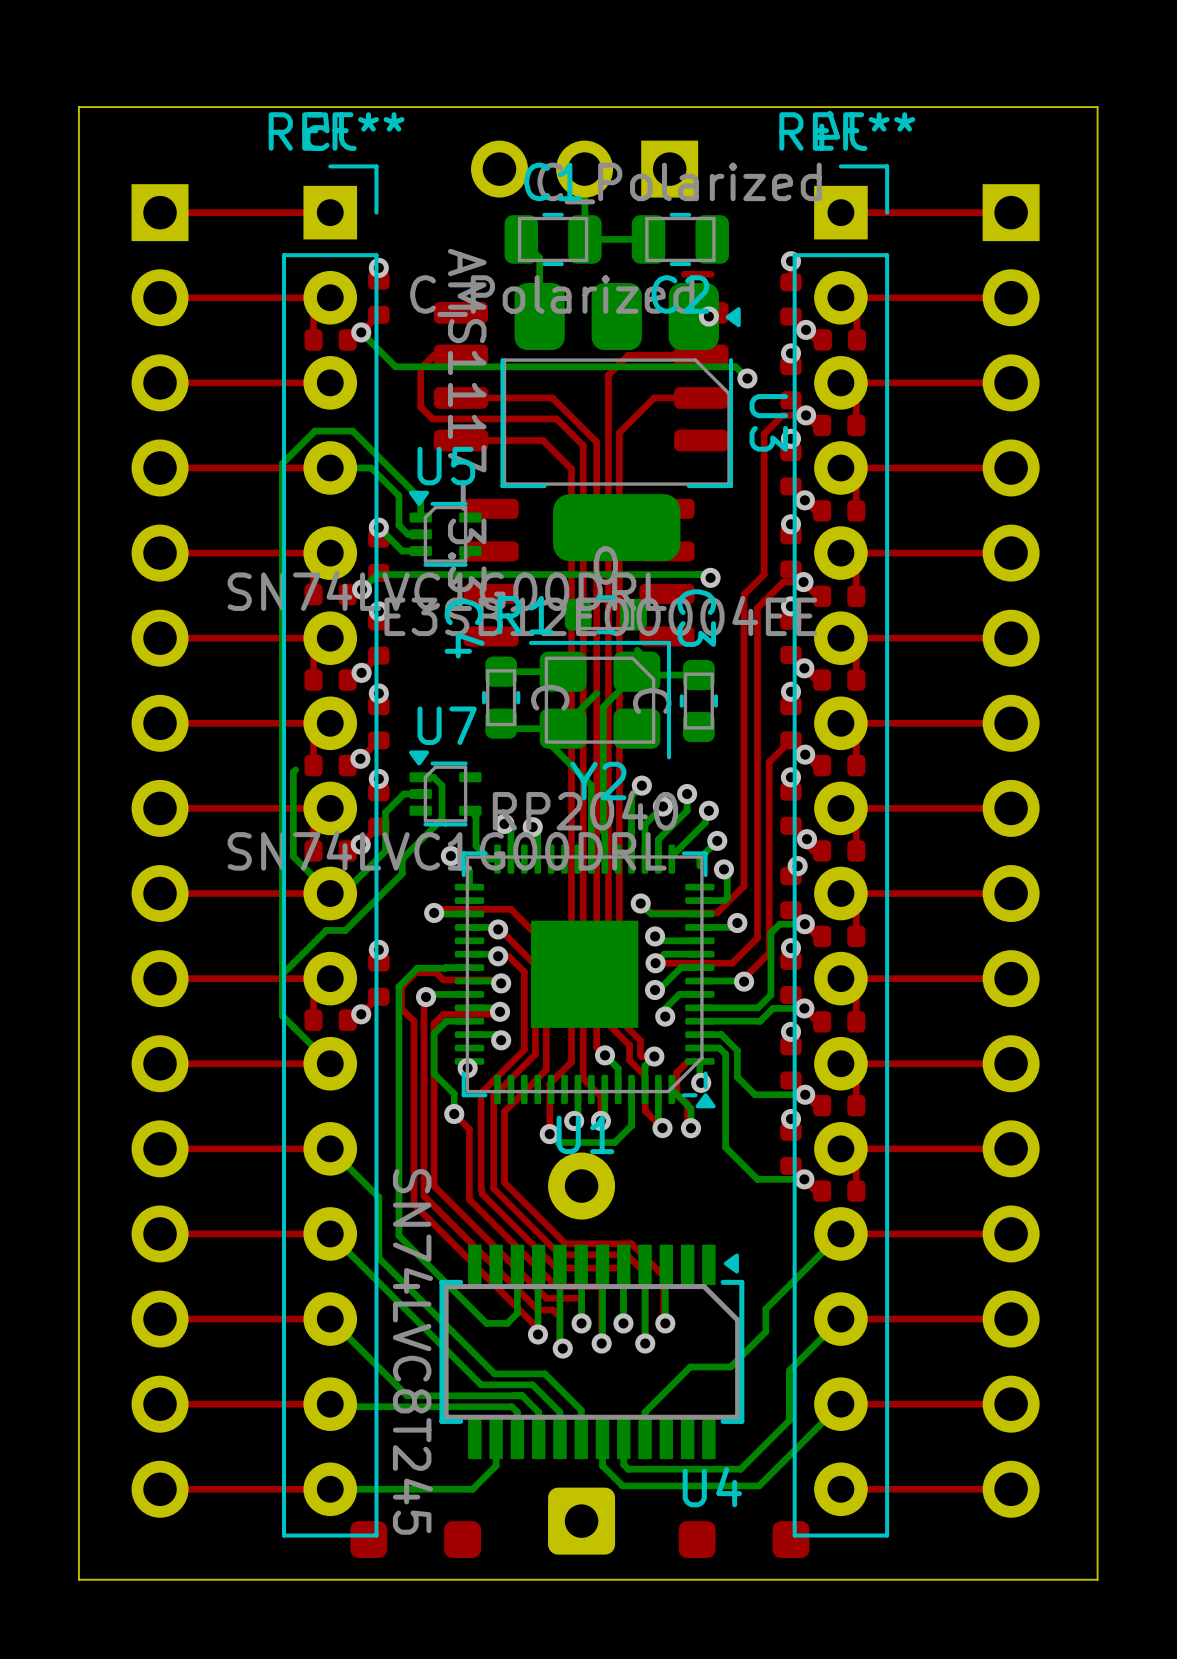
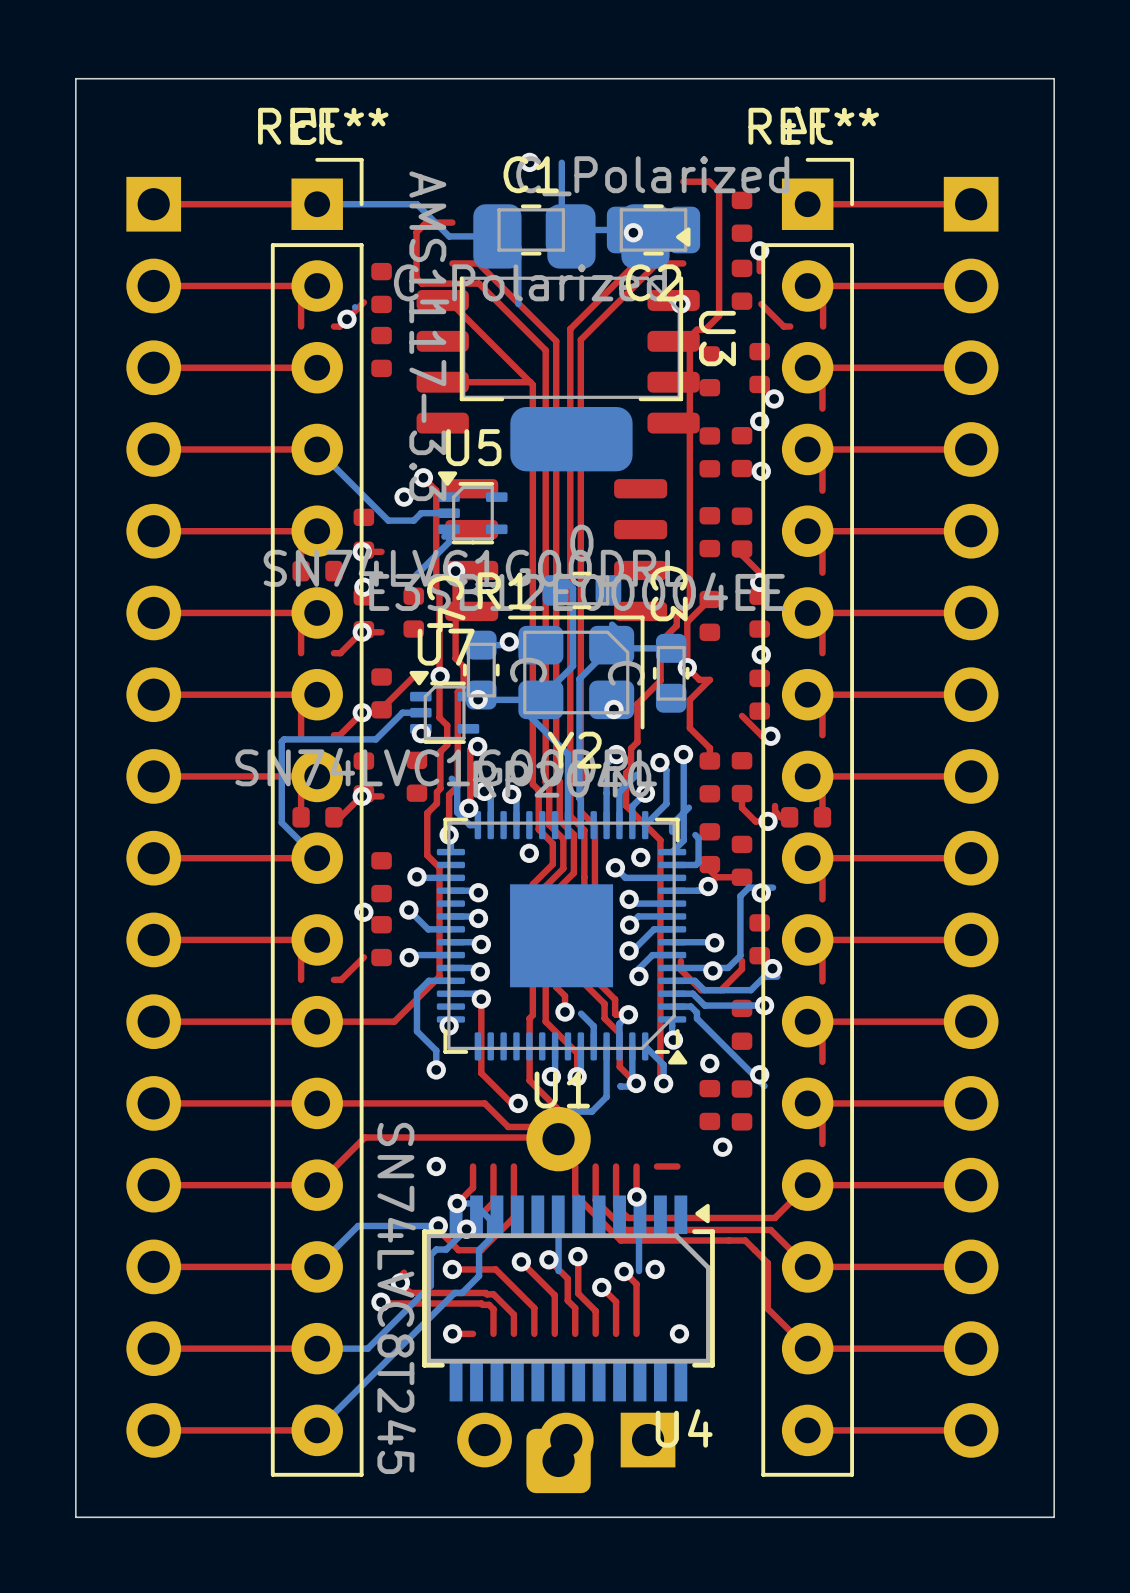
board edge: (1097, 107) (78, 107) -> (1054, 102) (1054, 78) (75, 78) (75, 102)
via: none -> (529, 162)
part: (584, 169) -> none
bottom track: none -> (317, 204) (416, 204) (449, 236) (497, 236)
part: none -> (742, 216)
via: none -> (633, 232)
via: (378, 267) -> none
top track: none -> (452, 263) (478, 263) (556, 341) (556, 777) (559, 781) (559, 820) (573, 834) (573, 873) (556, 890) (556, 987) (565, 995) (565, 1012)
part position: (378, 297) -> (381, 287)
part position: (790, 299) -> (742, 284)
via: (806, 329) -> none
bottom track: (361, 332) (395, 366) (735, 366) (747, 378) -> none
part rotation: 0° (330, 339) -> 90° clockwise (381, 351)
part position: (330, 339) -> (381, 351)
part: (839, 339) -> none
via: (790, 353) -> none
top track: (460, 355) (433, 355) (420, 368) (420, 407) (432, 418) (556, 418) (583, 445) (583, 1078) -> (452, 222) (426, 222) (416, 232) (416, 278) (421, 283) (479, 283) (545, 350) (545, 782) (549, 785) (549, 824) (563, 838) (563, 868) (545, 886) (545, 1021) (560, 1036)
top track: (701, 355) (628, 355) (608, 375) (608, 864) -> (676, 222) (570, 329) (570, 816) (584, 830)
via: (747, 378) -> none
part: none -> (709, 371)
top track: (701, 397) (654, 397) (619, 432) (619, 859) -> (657, 263) (580, 339) (580, 811) (594, 825)
top track: (554, 400) (596, 442) (596, 1046) (605, 1055) -> (532, 384) (532, 784) (538, 790) (538, 829) (552, 843) (552, 864) (532, 884) (532, 1015) (529, 1018) (529, 1080) (560, 1111)
top track: (806, 415) (782, 415) (764, 433) (764, 574) (744, 594) (744, 886) (717, 912) (650, 912) (640, 903) -> none
U3 position: (620, 422) -> (575, 337)
part: (839, 425) -> none
top track: (460, 440) (543, 440) (571, 468) (571, 1062) (549, 1083) (549, 1134) -> none
bottom track: (330, 467) (371, 467) (398, 495) (398, 525) (407, 534) (420, 534) -> (317, 449) (388, 520) (413, 520) (421, 513) (449, 513)
part position: (790, 469) -> (742, 452)
part: none -> (709, 452)
top track: none -> (423, 477) (436, 490) (436, 590) (439, 593) (439, 676)
via: none -> (423, 477)
via position: (804, 500) -> (761, 471)
part: (839, 510) -> none
bottom track: (420, 517) (420, 499) (352, 431) (314, 431) (282, 463) (282, 1015) (330, 1063) -> none
via: none -> (404, 497)
via: (790, 524) -> none
bottom track: (378, 527) (402, 551) (420, 551) -> none
via: (378, 527) -> none
U5 position: (445, 528) -> (472, 507)
bottom track: none -> (449, 529) (449, 542) (413, 577)
part position: (790, 552) -> (742, 532)
part: none -> (709, 532)
top track: none -> (381, 551) (362, 551)
top track: none -> (742, 551) (742, 555) (761, 574)
bottom track: (710, 577) (707, 574) (377, 574) (362, 589) -> none
via: (710, 577) -> none
top track: (803, 582) (783, 582) (757, 608) (757, 938) (732, 963) (655, 963) -> none
via: (803, 582) -> none
via position: (362, 589) -> (362, 551)
top track: none -> (455, 571) (455, 658) (463, 666) (463, 686) (457, 691) (457, 786) (449, 794) (449, 835)
via: none -> (455, 571)
part: (839, 596) -> none
bottom track: none -> (558, 574) (573, 588) (573, 666)
top track: none -> (709, 599) (687, 621) (687, 667) (699, 679) (709, 679) (689, 699) (689, 728) (709, 748) (709, 761)
part: none -> (413, 612)
part: none -> (709, 615)
top track: none -> (381, 632) (362, 632)
via: none -> (509, 641)
via: (804, 668) -> none
via position: (361, 672) -> (362, 632)
part: (330, 680) -> none
part: (839, 680) -> none
via: none -> (761, 654)
via: (790, 691) -> none
via: (378, 693) -> none
via: none -> (687, 667)
top track: none -> (413, 676) (381, 709)
top track: none -> (440, 676) (439, 717) (447, 725) (447, 744) (440, 751) (440, 788) (436, 792) (436, 803) (427, 813) (427, 855) (439, 867) (439, 976) (394, 1021) (317, 1021)
via: none -> (440, 676)
part position: (378, 723) -> (381, 693)
via: none -> (478, 699)
via: none -> (613, 709)
bottom track: none -> (420, 712) (402, 712) (375, 739) (284, 739)
top track: none -> (742, 715) (762, 736) (770, 736)
via: (805, 754) -> none
via position: (360, 758) -> (362, 712)
via: none -> (421, 733)
part: (330, 765) -> none
top track: (822, 765) (816, 765) (790, 740) (769, 762) (769, 953) (744, 978) (744, 981) -> none
part: (839, 765) -> none
via: none -> (770, 736)
bottom track: (420, 777) (433, 777) (442, 785) (442, 819) (402, 858) (402, 873) (345, 930) (326, 930) (282, 974) -> none
top track: none -> (477, 746) (473, 746) (470, 749) (468, 808)
via: none -> (477, 746)
via: (790, 777) -> none
via: (378, 778) -> none
bottom track: none -> (683, 754) (683, 840) (672, 852)
via: none -> (683, 754)
U7 position: (445, 788) -> (444, 707)
bottom track: (420, 794) (403, 794) (385, 812) (385, 850) (342, 893) (330, 893) -> none
bottom track: (687, 794) (687, 810) (672, 825) -> none
via position: (662, 806) -> (645, 793)
part: none -> (416, 776)
part position: (790, 808) -> (742, 777)
part: none -> (709, 777)
bottom track: (708, 810) (705, 814) (705, 822) (671, 856) (671, 859) -> (654, 758) (666, 770) (666, 803) (645, 825)
via: (708, 810) -> none
top track: none -> (381, 796) (362, 796)
top track: none -> (742, 796) (742, 807) (755, 821) (767, 821)
via: (806, 839) -> none
via: (717, 840) -> none
via: none -> (468, 808)
via position: (360, 844) -> (362, 796)
via position: (450, 855) -> (449, 835)
via: none -> (767, 821)
via: (797, 866) -> none
via: (723, 869) -> none
part: none -> (709, 848)
via: none -> (529, 853)
via: none -> (640, 857)
part position: (790, 893) -> (742, 860)
top track: none -> (709, 870) (716, 877) (742, 877)
top track: (434, 912) (437, 909) (510, 909) (545, 943) (546, 1069) (504, 1111) (504, 1182) (565, 1243) (631, 1243) (663, 1276) (663, 1311) (665, 1313) -> none
part: none -> (381, 877)
via: (804, 924) -> none
top track: (498, 929) (535, 964) (535, 1054) (493, 1096) (493, 1188) (559, 1254) (626, 1254) (645, 1273) (645, 1333) -> none
via: none -> (761, 892)
part: (839, 936) -> none
via: none -> (408, 910)
via: (790, 948) -> none
top track: (498, 956) (508, 956) (524, 971) (524, 1049) (481, 1093) (481, 1193) (556, 1268) (623, 1268) (623, 1313) -> none
bottom track: (445, 967) (417, 968) (398, 986) (398, 1235) (486, 1323) (507, 1323) (517, 1313) (517, 1264) -> (428, 929) (408, 910)
part position: (378, 979) -> (381, 941)
top track: (501, 983) (497, 979) (443, 979) (436, 972) (415, 972) (401, 986) (401, 1008) (414, 1021) (414, 1204) (538, 1328) (538, 1334) -> none
top track: (426, 997) (424, 999) (424, 1196) (538, 1310) (553, 1310) (559, 1316) (559, 1343) -> none
top track: none -> (742, 960) (742, 969) (720, 990) (701, 990) (680, 969) (680, 961)
bottom track: (804, 1008) (772, 1008) (760, 1021) (723, 1021) -> (777, 976) (764, 976) (750, 990) (704, 990) (694, 980)
via: none -> (712, 970)
top track: (500, 1011) (497, 1014) (443, 1014) (434, 1023) (434, 1186) (546, 1298) (581, 1298) (581, 1313) -> none
via: (361, 1014) -> none
part: (330, 1020) -> none
part: (839, 1021) -> none
via position: (790, 1031) -> (764, 1005)
top track: none -> (481, 999) (481, 1073) (511, 1103) (518, 1103)
bottom track: (733, 1046) (737, 1050) (737, 1077) (754, 1094) (805, 1094) -> (704, 1005) (764, 1005)
via position: (605, 1055) -> (565, 1012)
bottom track: (725, 1060) (725, 1147) (757, 1179) (804, 1179) -> (696, 1018) (764, 1086)
top track: (687, 1061) (676, 1072) (676, 1093) (687, 1103) -> (683, 181) (709, 181) (719, 191) (719, 315) (705, 329) (696, 329) (689, 336) (689, 604) (676, 617) (676, 625) (660, 641) (660, 680) (637, 703) (637, 742) (631, 748) (631, 767) (626, 772) (626, 805) (660, 840) (660, 1060)
part position: (790, 1063) -> (742, 1024)
via: (805, 1094) -> none
part: (839, 1105) -> none
via: none -> (709, 1063)
top track: (454, 1114) (469, 1129) (469, 1199) (556, 1286) (601, 1286) (601, 1333) -> none
bottom track: (631, 1125) (614, 1142) (558, 1142) (549, 1134) -> (606, 1081) (606, 1096) (591, 1111) (569, 1111)
bottom track: none -> (620, 1086) (633, 1086)
via position: (549, 1134) -> (518, 1103)
top track: none -> (317, 1103) (484, 1103) (508, 1126) (541, 1126)
bottom track: (330, 1148) (378, 1197) (378, 1258) (494, 1373) (544, 1373) (581, 1410) (581, 1439) -> none
part position: (790, 1148) -> (742, 1105)
part: none -> (709, 1105)
via: (804, 1179) -> none
top track: none -> (531, 1137) (364, 1137) (317, 1185)
part: (839, 1191) -> none
via: none -> (722, 1147)
via: none -> (436, 1166)
top track: none -> (473, 1166) (473, 1187) (457, 1203)
top track: none -> (493, 1166) (493, 1202) (466, 1229)
top track: none -> (513, 1166) (513, 1217) (481, 1250) (458, 1250) (438, 1229) (438, 1225)
top track: none -> (575, 1166) (575, 1194) (620, 1240) (745, 1240) (767, 1263) (767, 1308) (807, 1348)
top track: none -> (595, 1166) (595, 1200) (625, 1229) (770, 1229) (807, 1266)
top track: none -> (616, 1166) (616, 1205) (628, 1217) (774, 1217) (807, 1185)
top track: none -> (636, 1166) (636, 1196)
top track: none -> (677, 1166) (656, 1166)
bottom track: (330, 1233) (481, 1384) (532, 1384) (559, 1412) (559, 1439) -> none
bottom track: (840, 1233) (765, 1309) (765, 1331) (730, 1366) (690, 1366) (645, 1412) (645, 1439) -> none
via: none -> (636, 1196)
via: none -> (457, 1203)
bottom track: (538, 1264) (538, 1323) -> none
bottom track: (559, 1264) (559, 1343) -> none
bottom track: (602, 1264) (601, 1343) -> none
bottom track: (645, 1264) (645, 1333) -> none
bottom track: (623, 1265) (623, 1313) -> none
via: none -> (438, 1225)
via: none -> (466, 1229)
via: none -> (577, 1256)
top track: none -> (578, 1256) (578, 1293) (595, 1310) (595, 1333)
top track: none -> (548, 1259) (567, 1278) (567, 1300) (575, 1308) (575, 1333)
via: none -> (548, 1259)
top track: none -> (521, 1261) (554, 1295) (554, 1333)
via: none -> (521, 1261)
bottom track: (330, 1319) (407, 1395) (522, 1395) (538, 1412) (538, 1439) -> (317, 1266) (358, 1225) (438, 1225)
bottom track: (840, 1319) (789, 1370) (789, 1420) (740, 1469) (628, 1469) (623, 1464) (623, 1439) -> none
top track: none -> (452, 1269) (495, 1269) (534, 1308) (534, 1333)
via: none -> (452, 1269)
via: none -> (655, 1269)
via: (581, 1323) -> none
via: (623, 1323) -> none
top track: none -> (624, 1271) (636, 1284) (636, 1333)
via: none -> (624, 1271)
via: (665, 1323) -> none
top track: none -> (404, 1272) (400, 1276) (400, 1282) (410, 1292) (493, 1294) (513, 1314) (513, 1333)
via: (538, 1334) -> none
via: none -> (400, 1282)
top track: none -> (601, 1287) (616, 1301) (616, 1333)
via: none -> (601, 1287)
via: (601, 1343) -> none
via: (645, 1343) -> none
via: (562, 1348) -> none
top track: none -> (381, 1302) (489, 1304) (493, 1309) (493, 1333)
via: none -> (381, 1302)
via: none -> (452, 1333)
top track: none -> (473, 1333) (452, 1333)
via: none -> (679, 1333)
bottom track: (330, 1404) (332, 1406) (511, 1406) (517, 1412) (517, 1439) -> (317, 1348) (367, 1348) (430, 1285) (430, 1255) (436, 1249) (446, 1249) (466, 1229)
bottom track: (840, 1404) (759, 1485) (622, 1485) (602, 1465) (602, 1439) -> none
bottom track: (496, 1439) (496, 1465) (472, 1489) (330, 1489) -> (457, 1203) (474, 1203) (490, 1219) (490, 1238) (479, 1249) (479, 1275) (462, 1292) (454, 1292) (317, 1430)
part: none -> (566, 1440)
part: (415, 1539) -> none
part: (744, 1539) -> none

